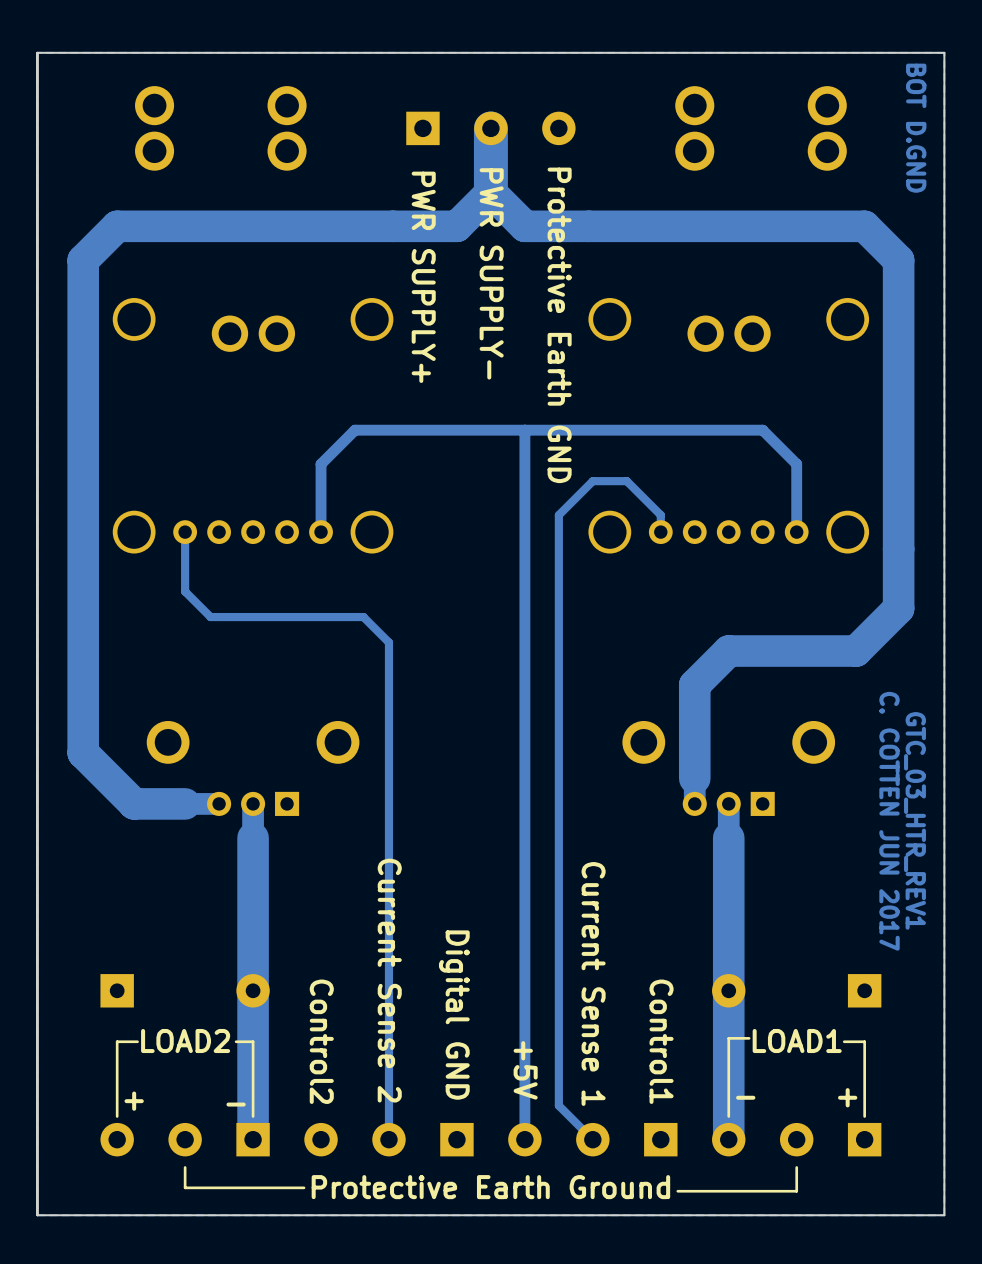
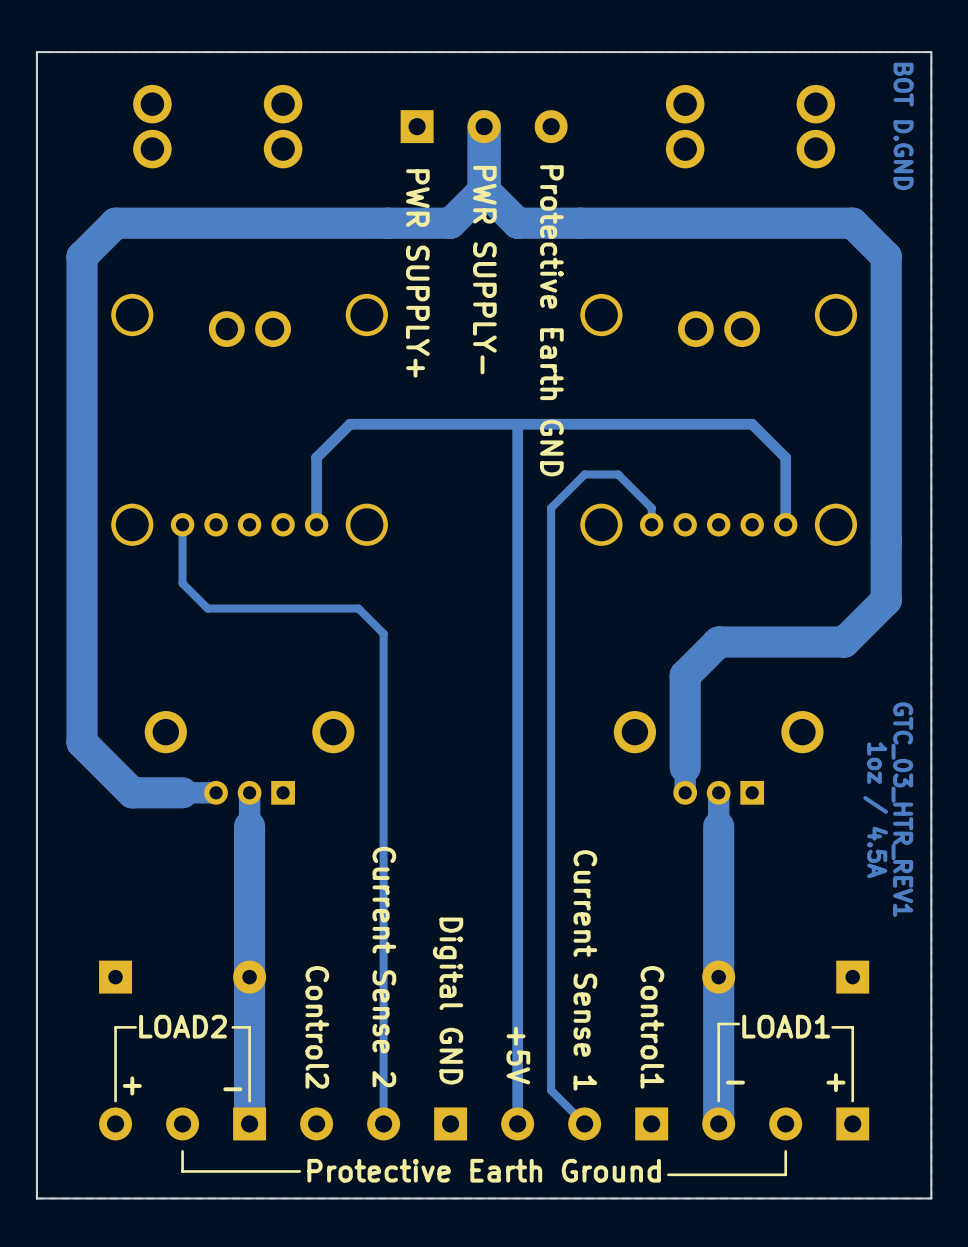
text: C. COTTEN JUN 2017 (889, 821) -> 1oz / 4.5A (875, 810)

